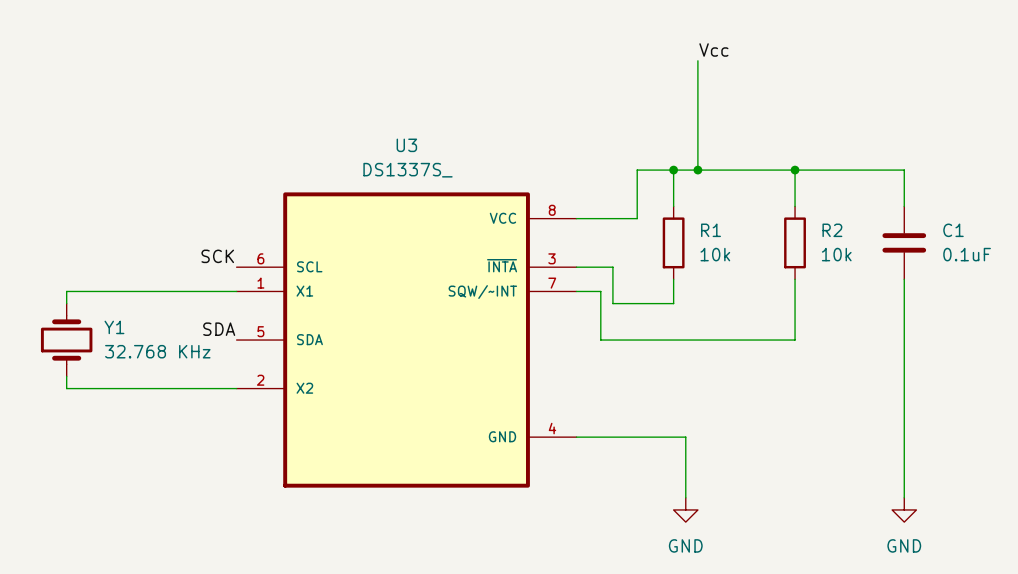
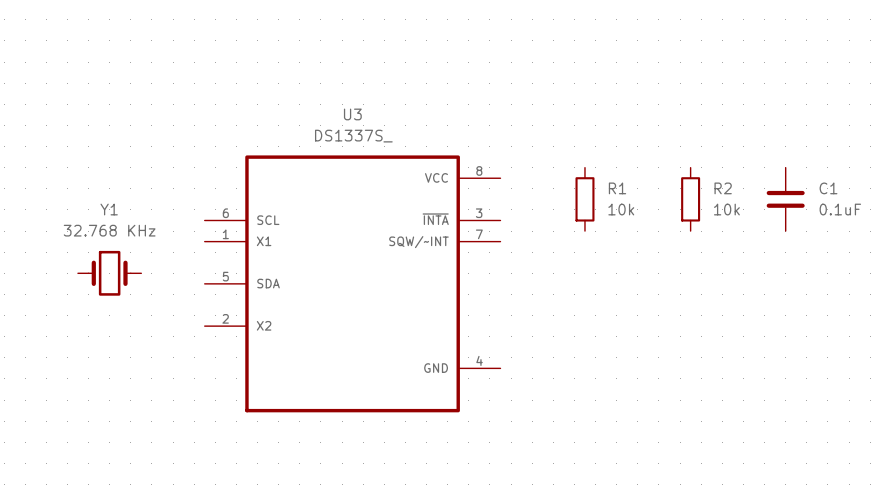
label: Vcc (713, 49) -> none
wire: (697, 60) (697, 170) -> none
wire: (673, 170) (673, 206) -> none
junction: (673, 170) -> none
junction: (697, 170) -> none
wire: (795, 170) (795, 206) -> none
junction: (795, 170) -> none
wire: (904, 206) (904, 170) (637, 170) (637, 218) (576, 218) -> none
label: SCK (217, 256) -> none
wire: (576, 267) (612, 267) (612, 303) (673, 303) (673, 279) -> none
wire: (795, 279) (795, 340) (600, 340) (600, 291) (576, 291) -> none
wire: (904, 279) (904, 497) -> none
wire: (236, 291) (66, 291) (66, 303) -> none
Y1 name position: Y1 (114, 327) -> Y1 (109, 209)
label: SDA (219, 329) -> none
Y1 rotation: 0° (66, 340) -> 90° clockwise (109, 273)
Y1 position: (66, 340) -> (109, 273)
Y1 value position: 32.768 KHz (157, 351) -> 32.768 KHz (109, 230)
wire: (66, 376) (66, 388) (236, 388) -> none
wire: (576, 437) (685, 437) (685, 497) -> none
power symbol: GND (685, 509) -> none
power symbol: GND (904, 509) -> none

